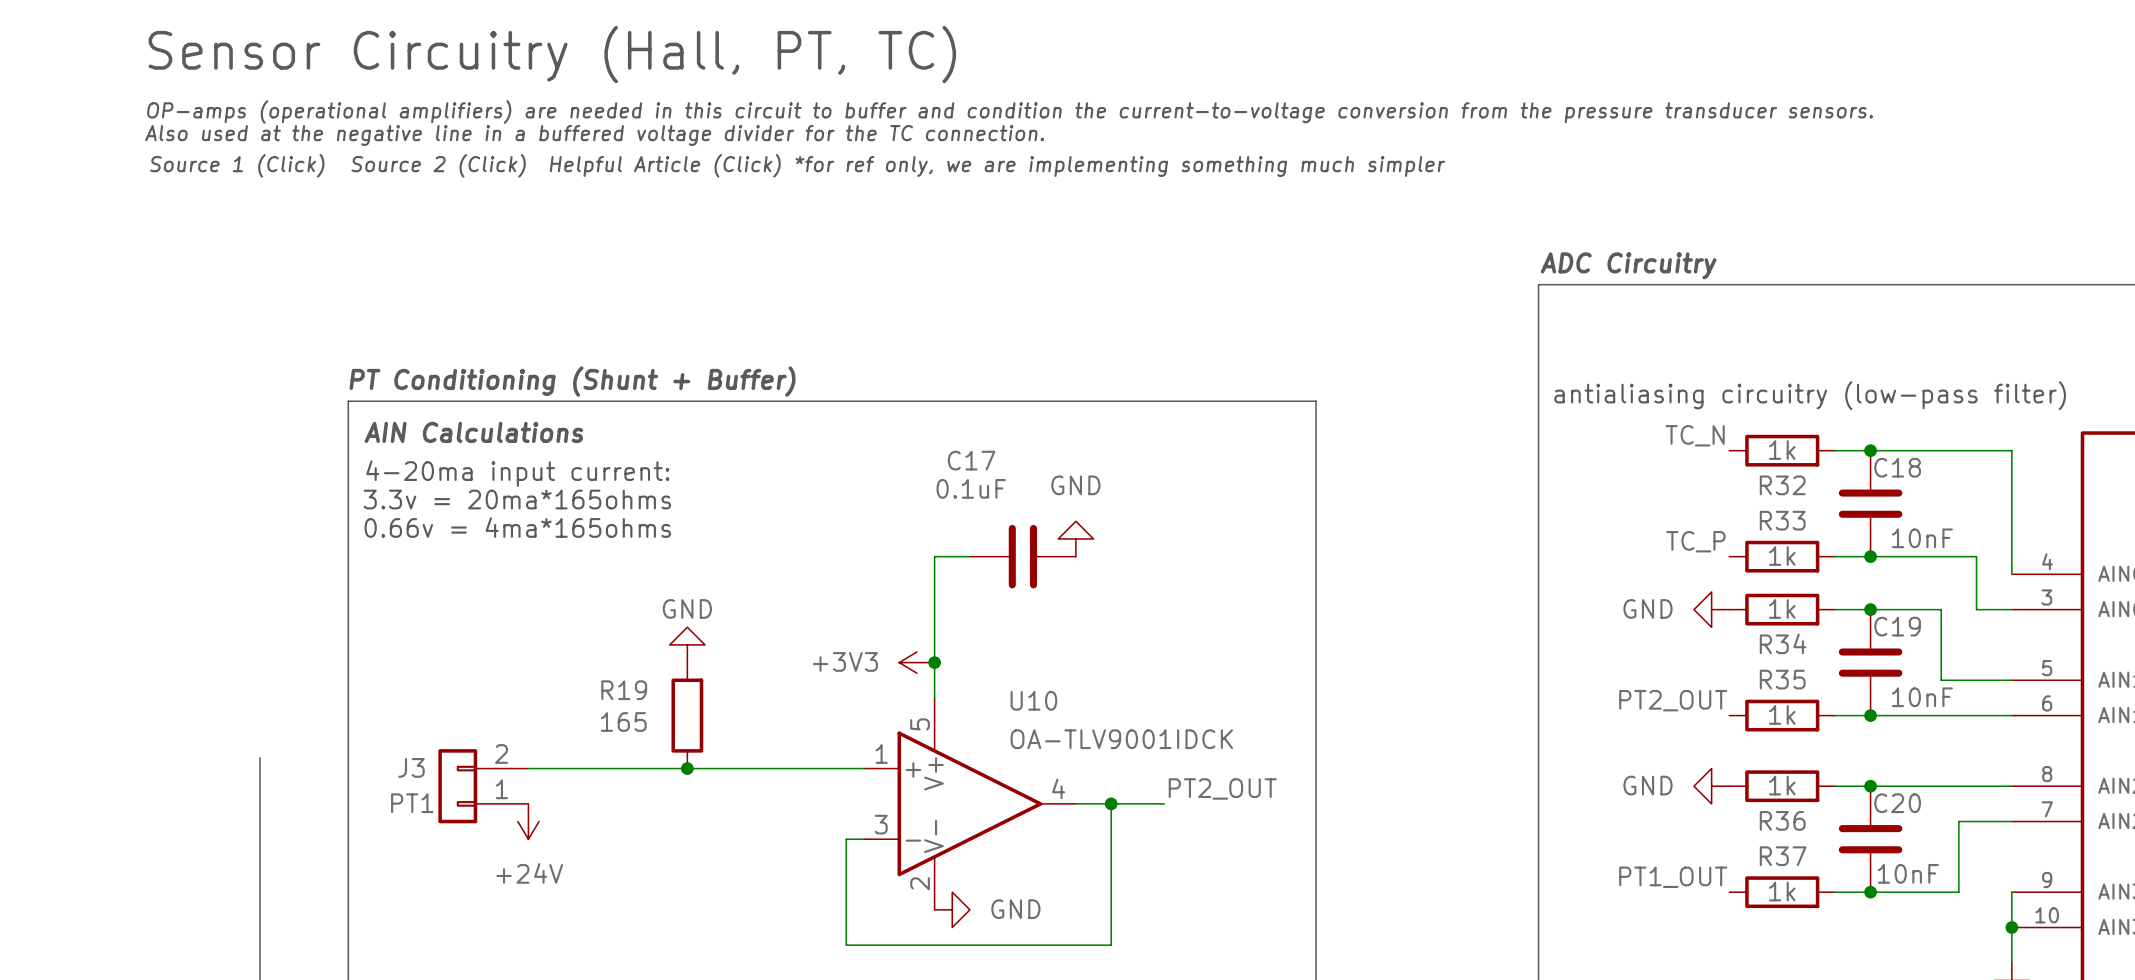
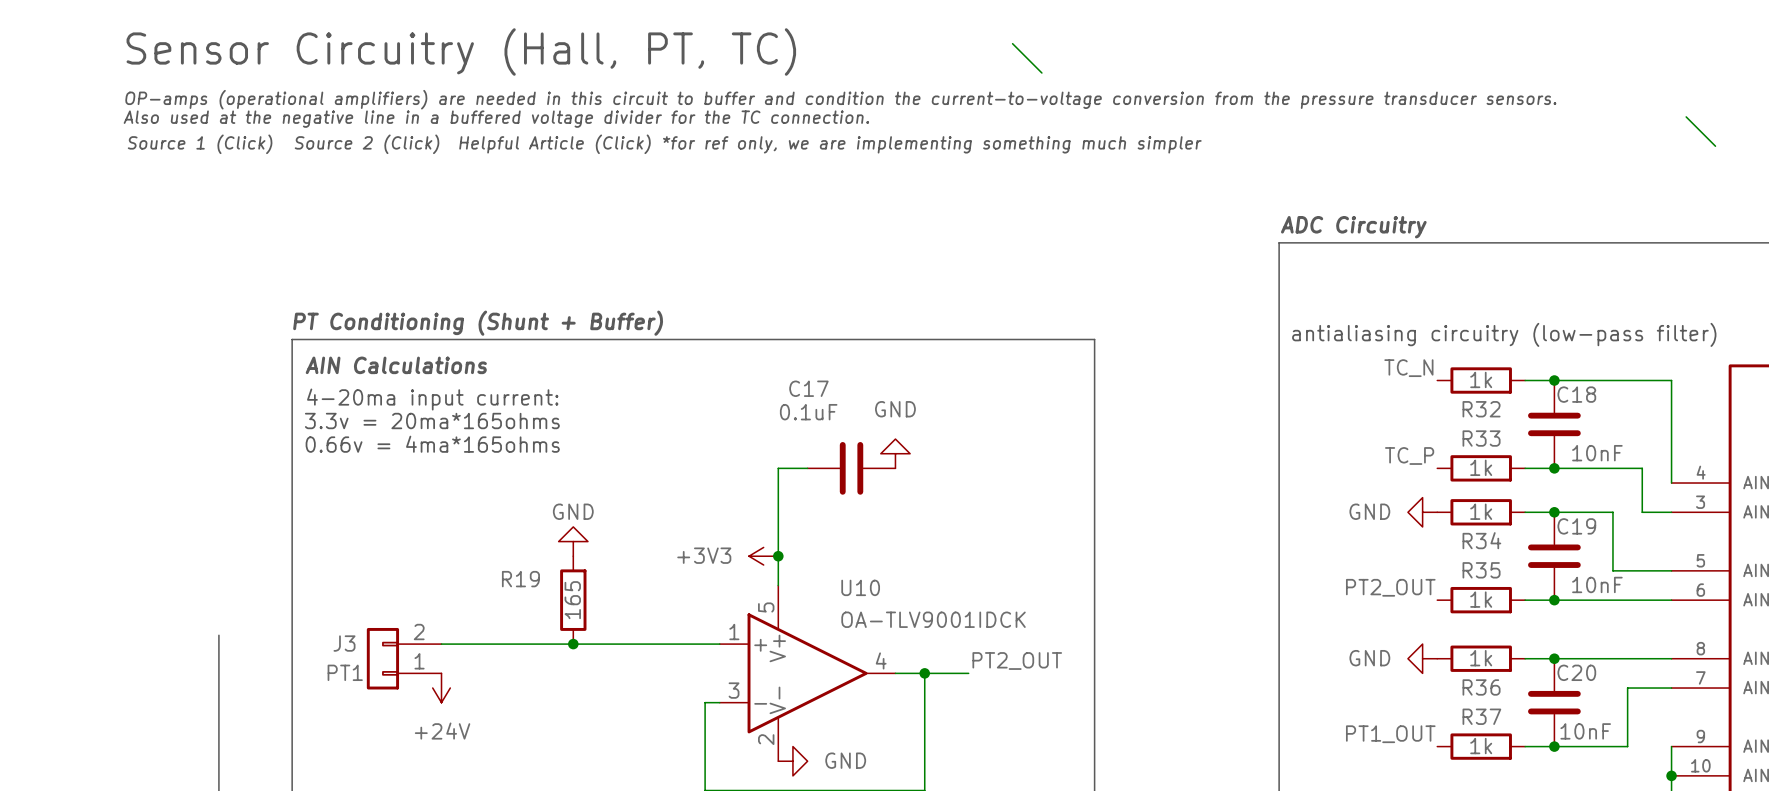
wire: none -> (1012, 43) (1041, 72)
wire: none -> (1686, 116) (1715, 146)
R19 value rotation: 0° (623, 721) -> 90° counterclockwise (572, 600)
R19 value position: 165 (623, 721) -> 165 (572, 600)

